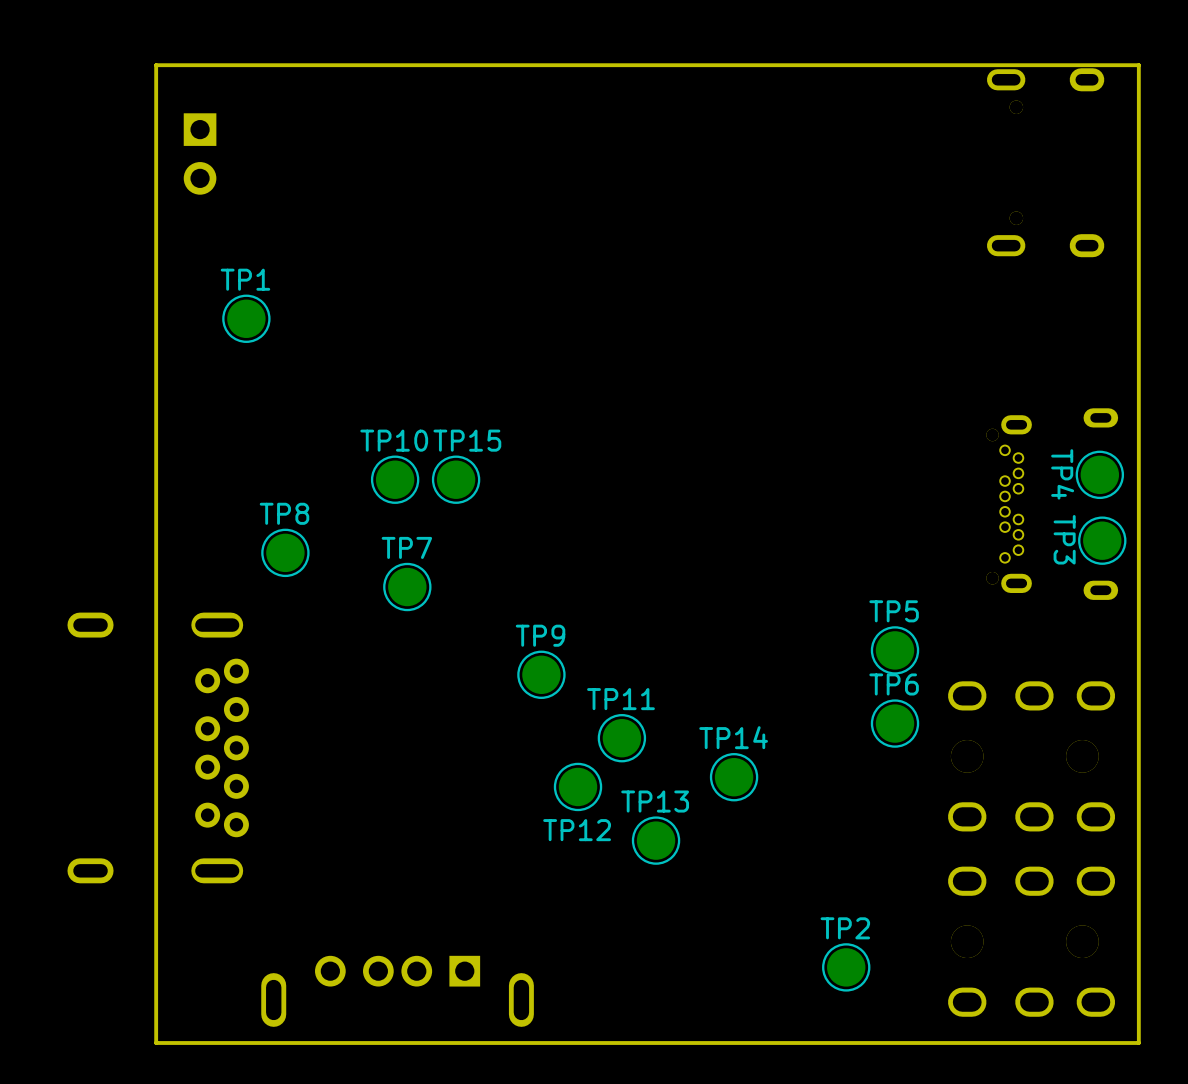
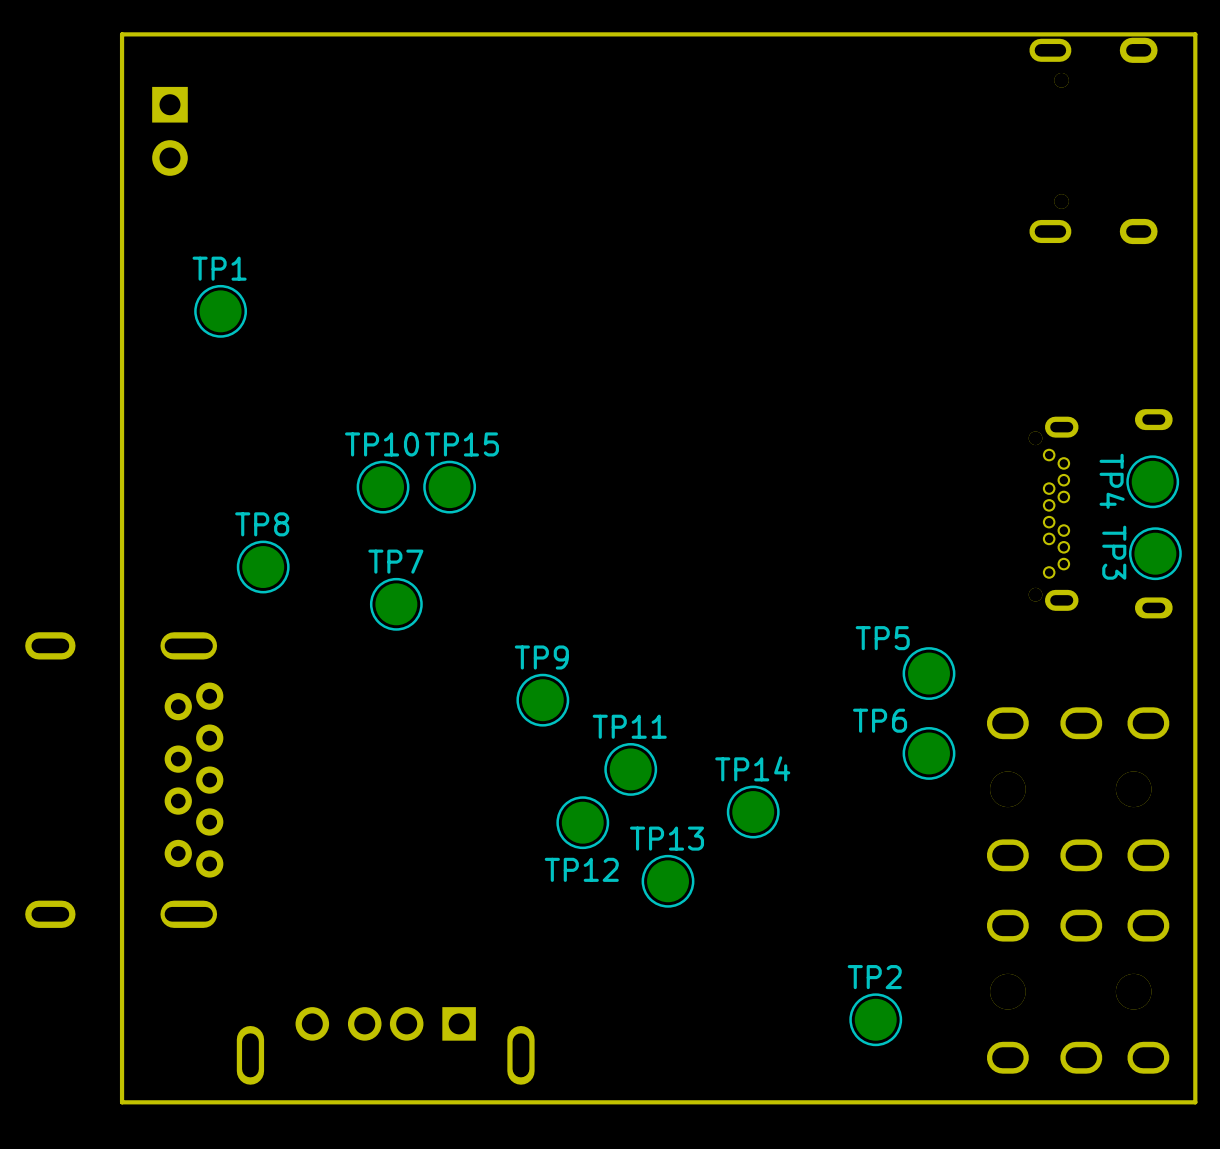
TP5 name position: TP5 (894, 611) -> TP5 (882, 638)
TP6 name position: TP6 (894, 684) -> TP6 (880, 720)

